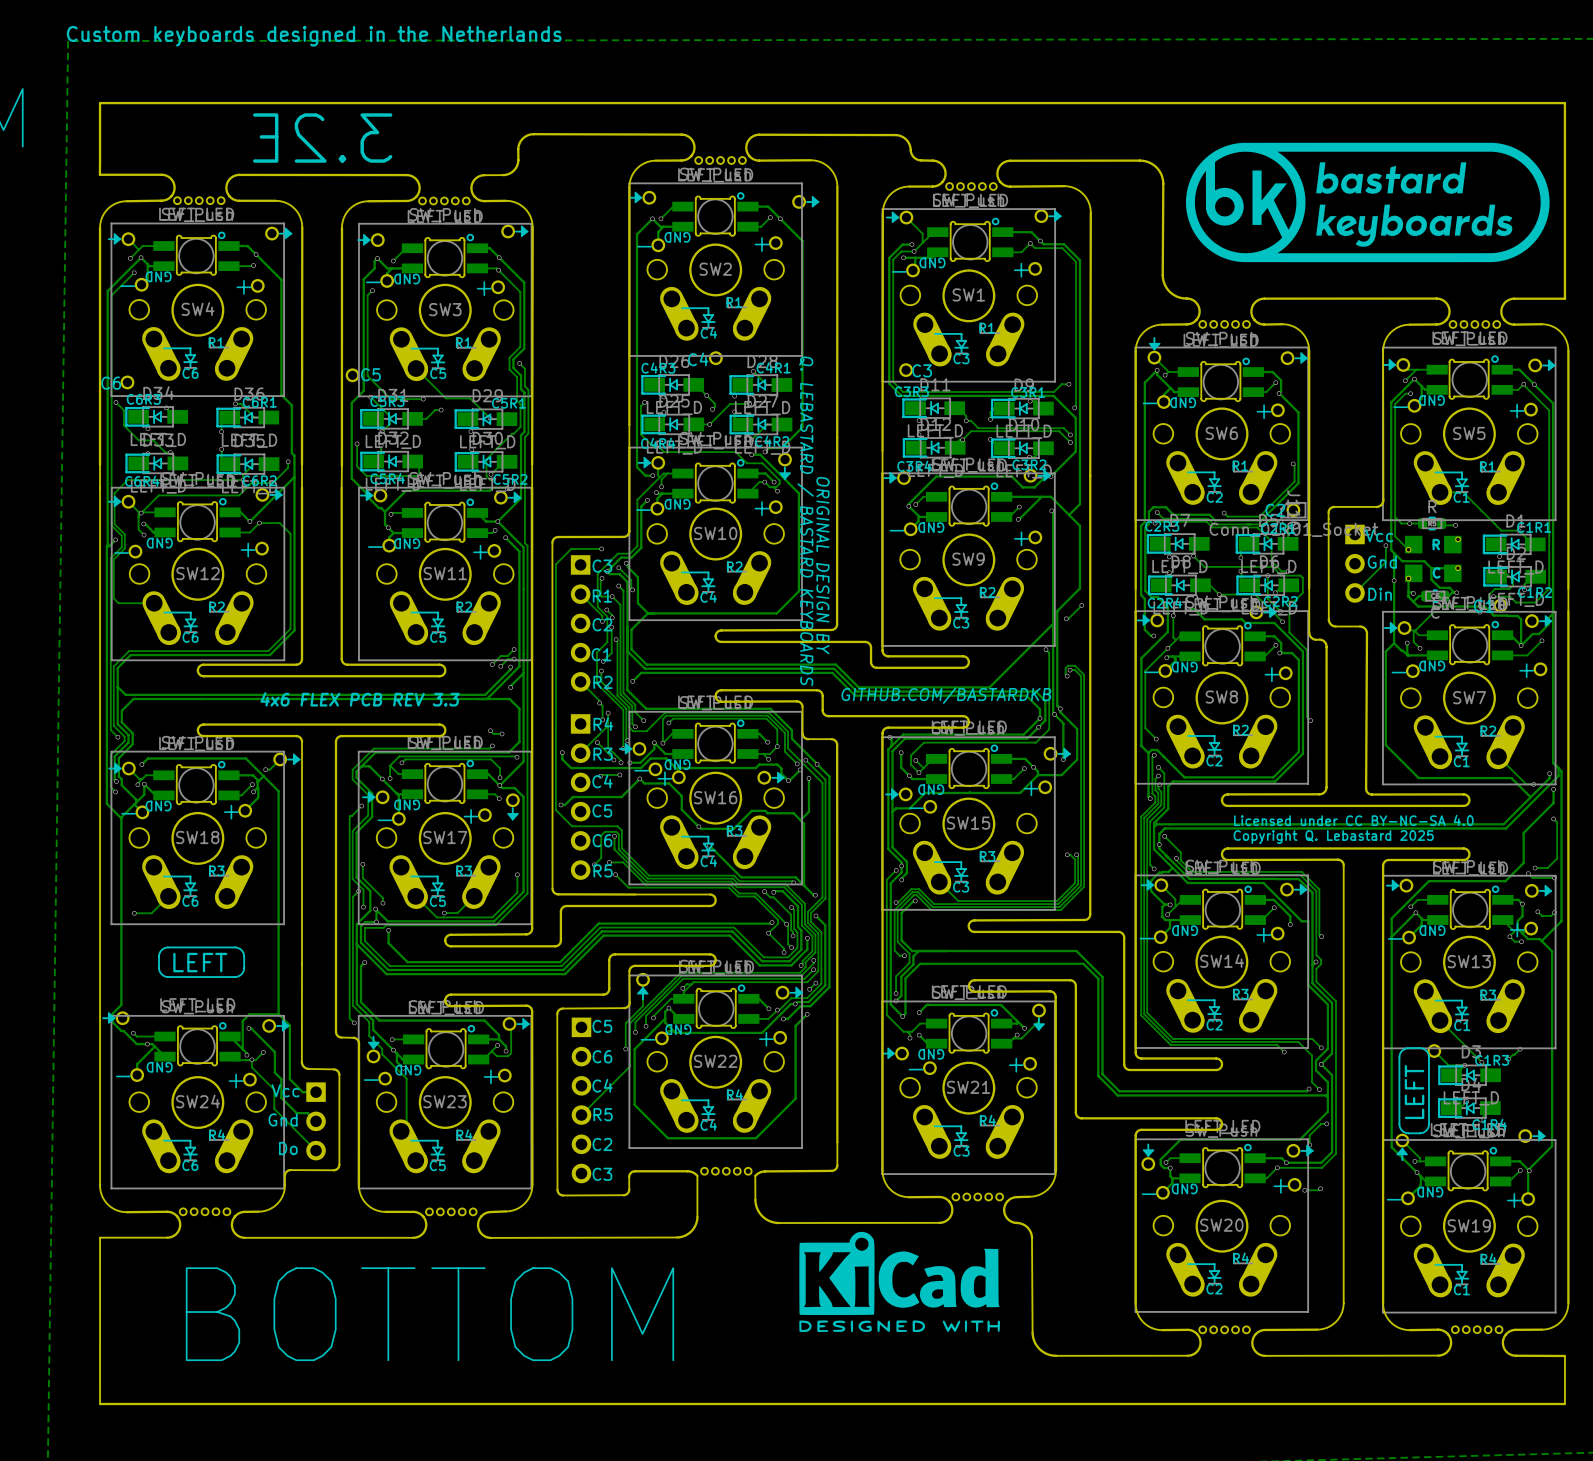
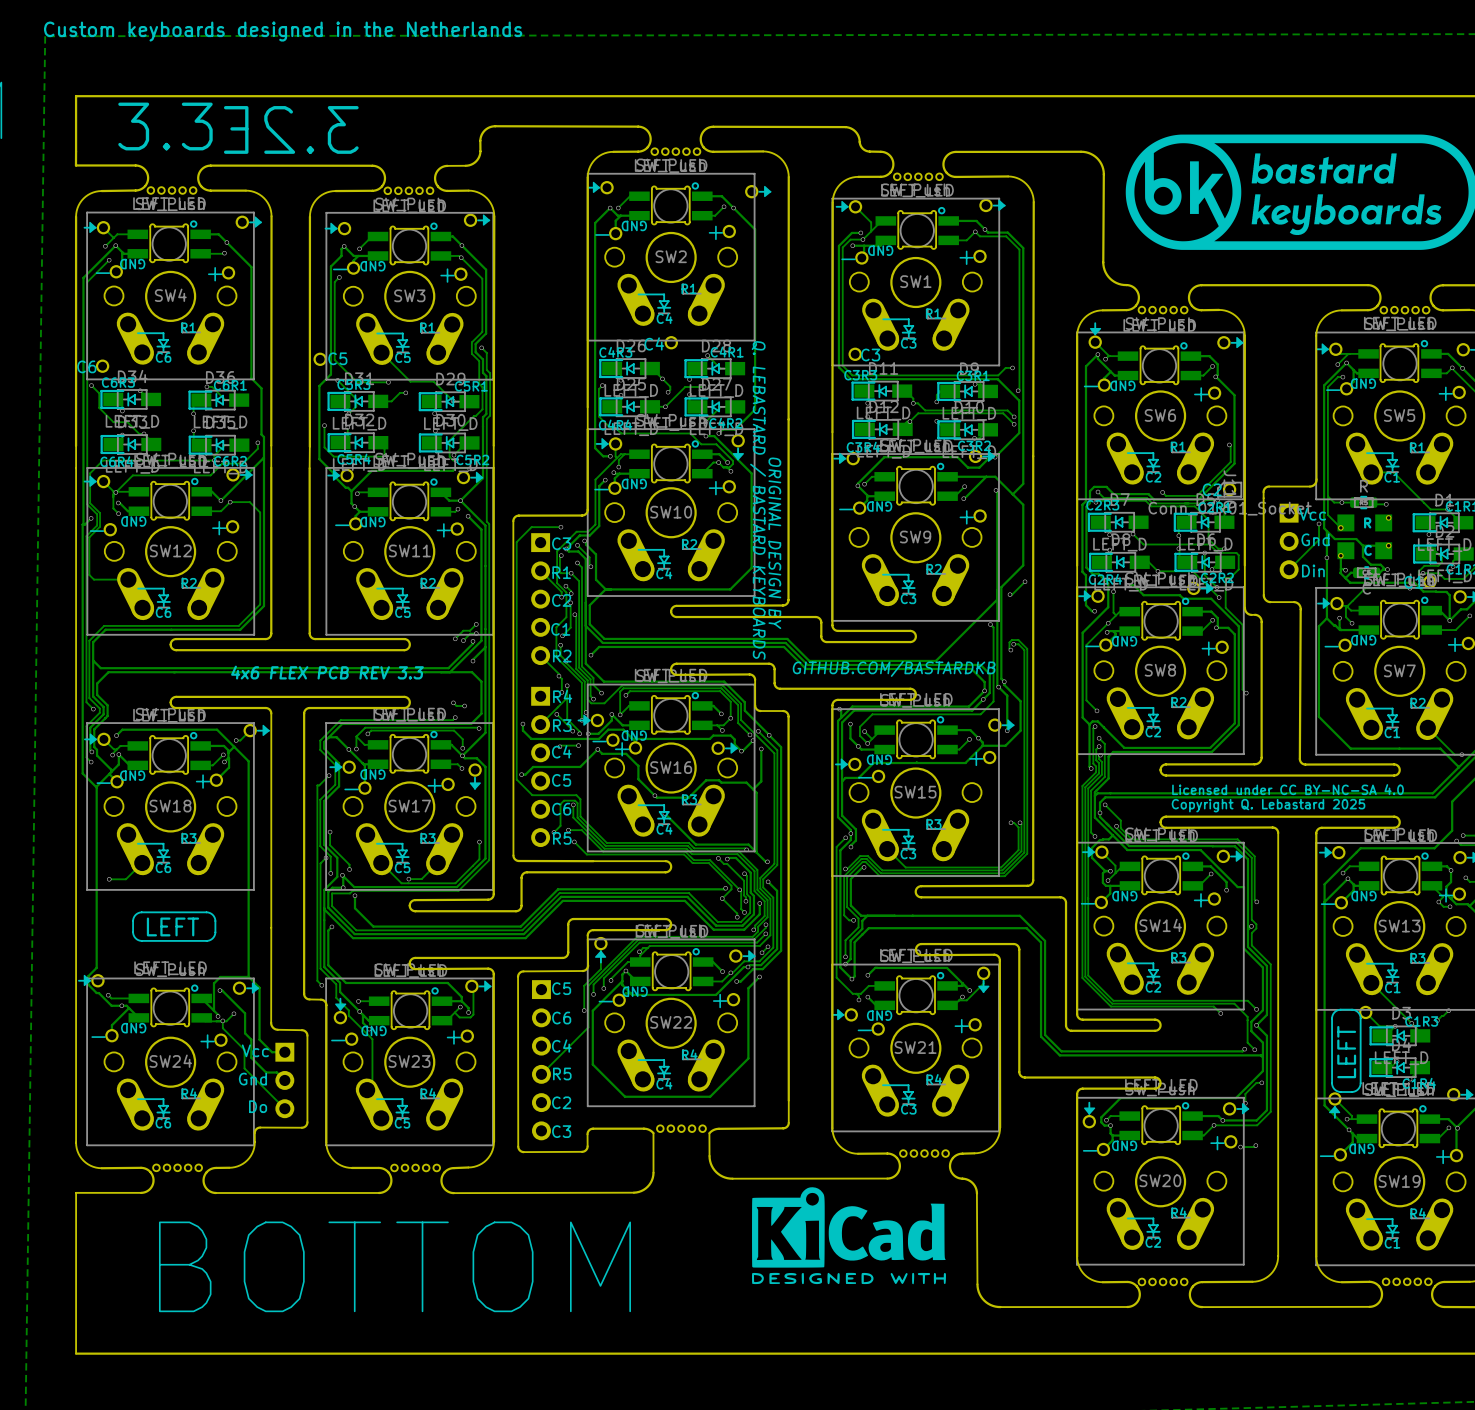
text: none -> 3.3 (165, 126)

